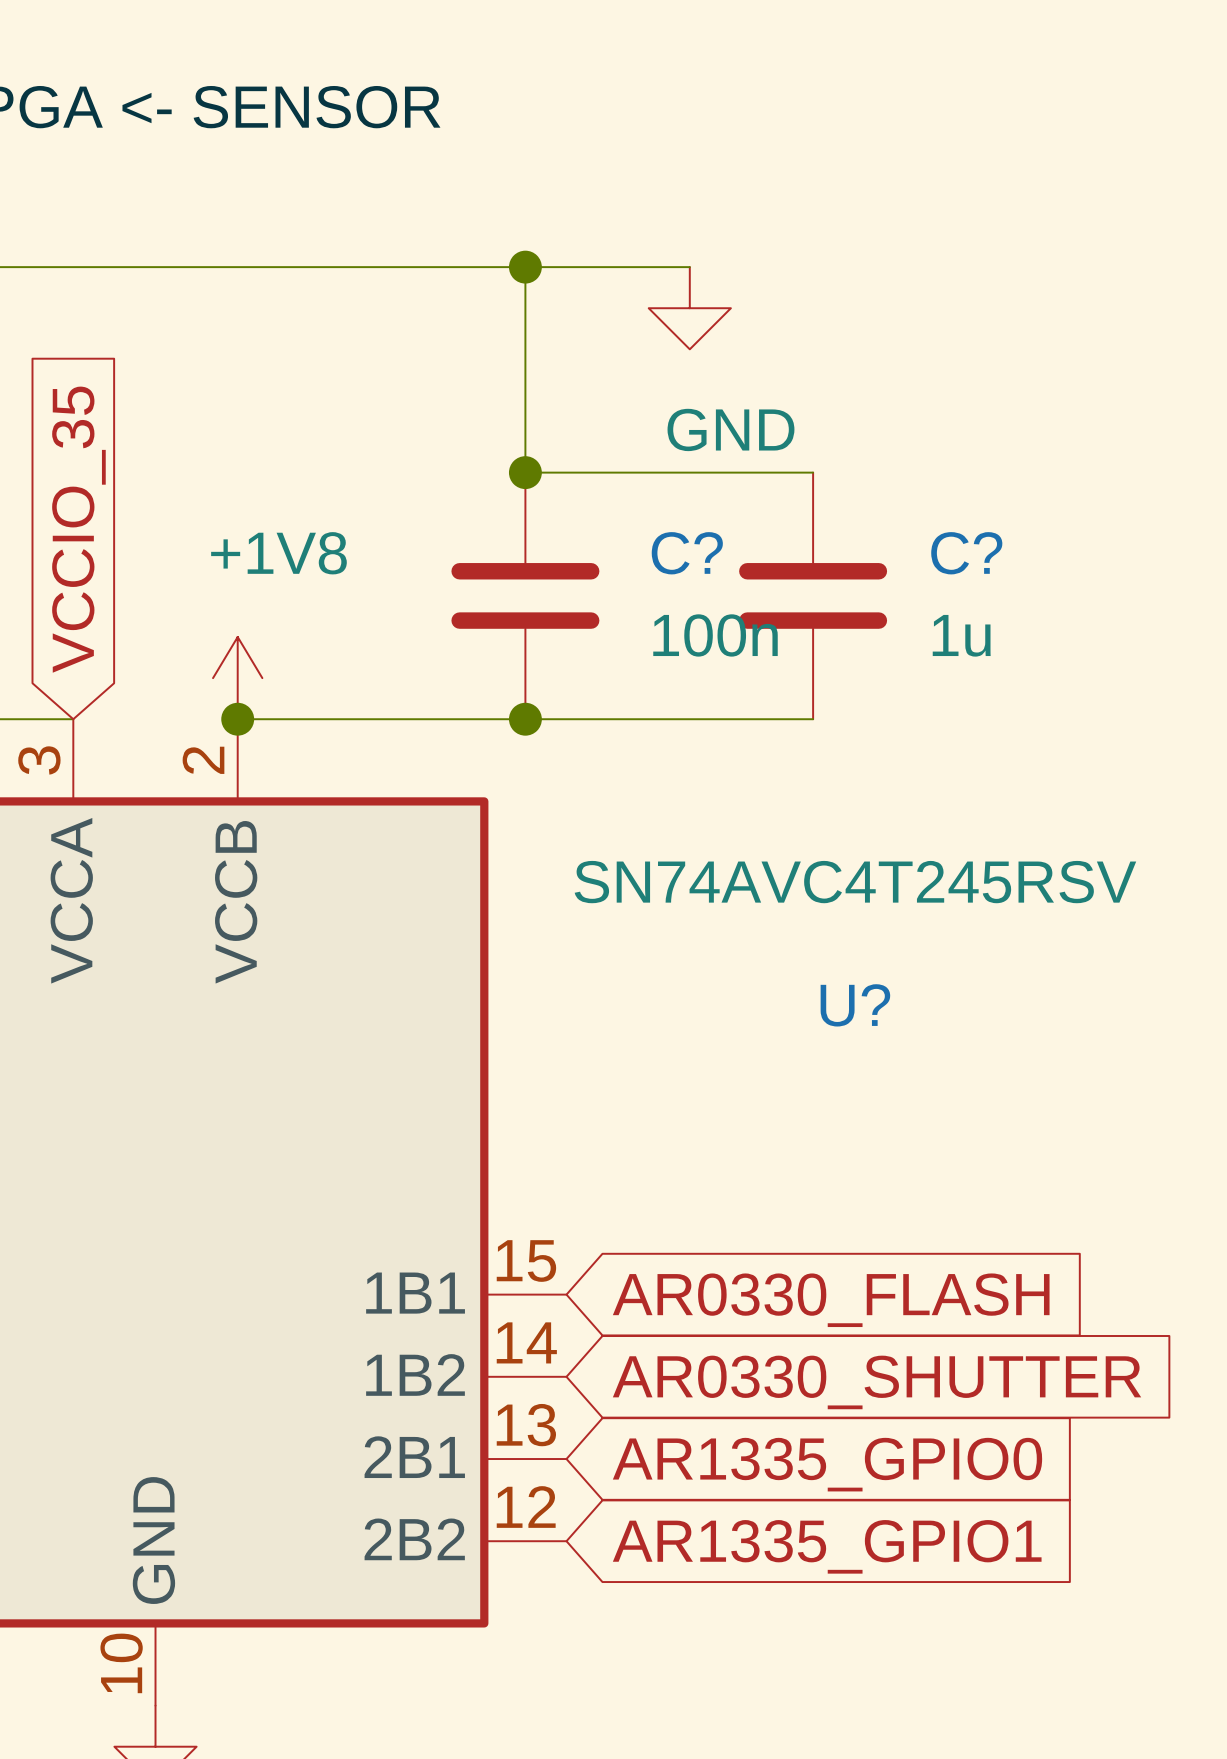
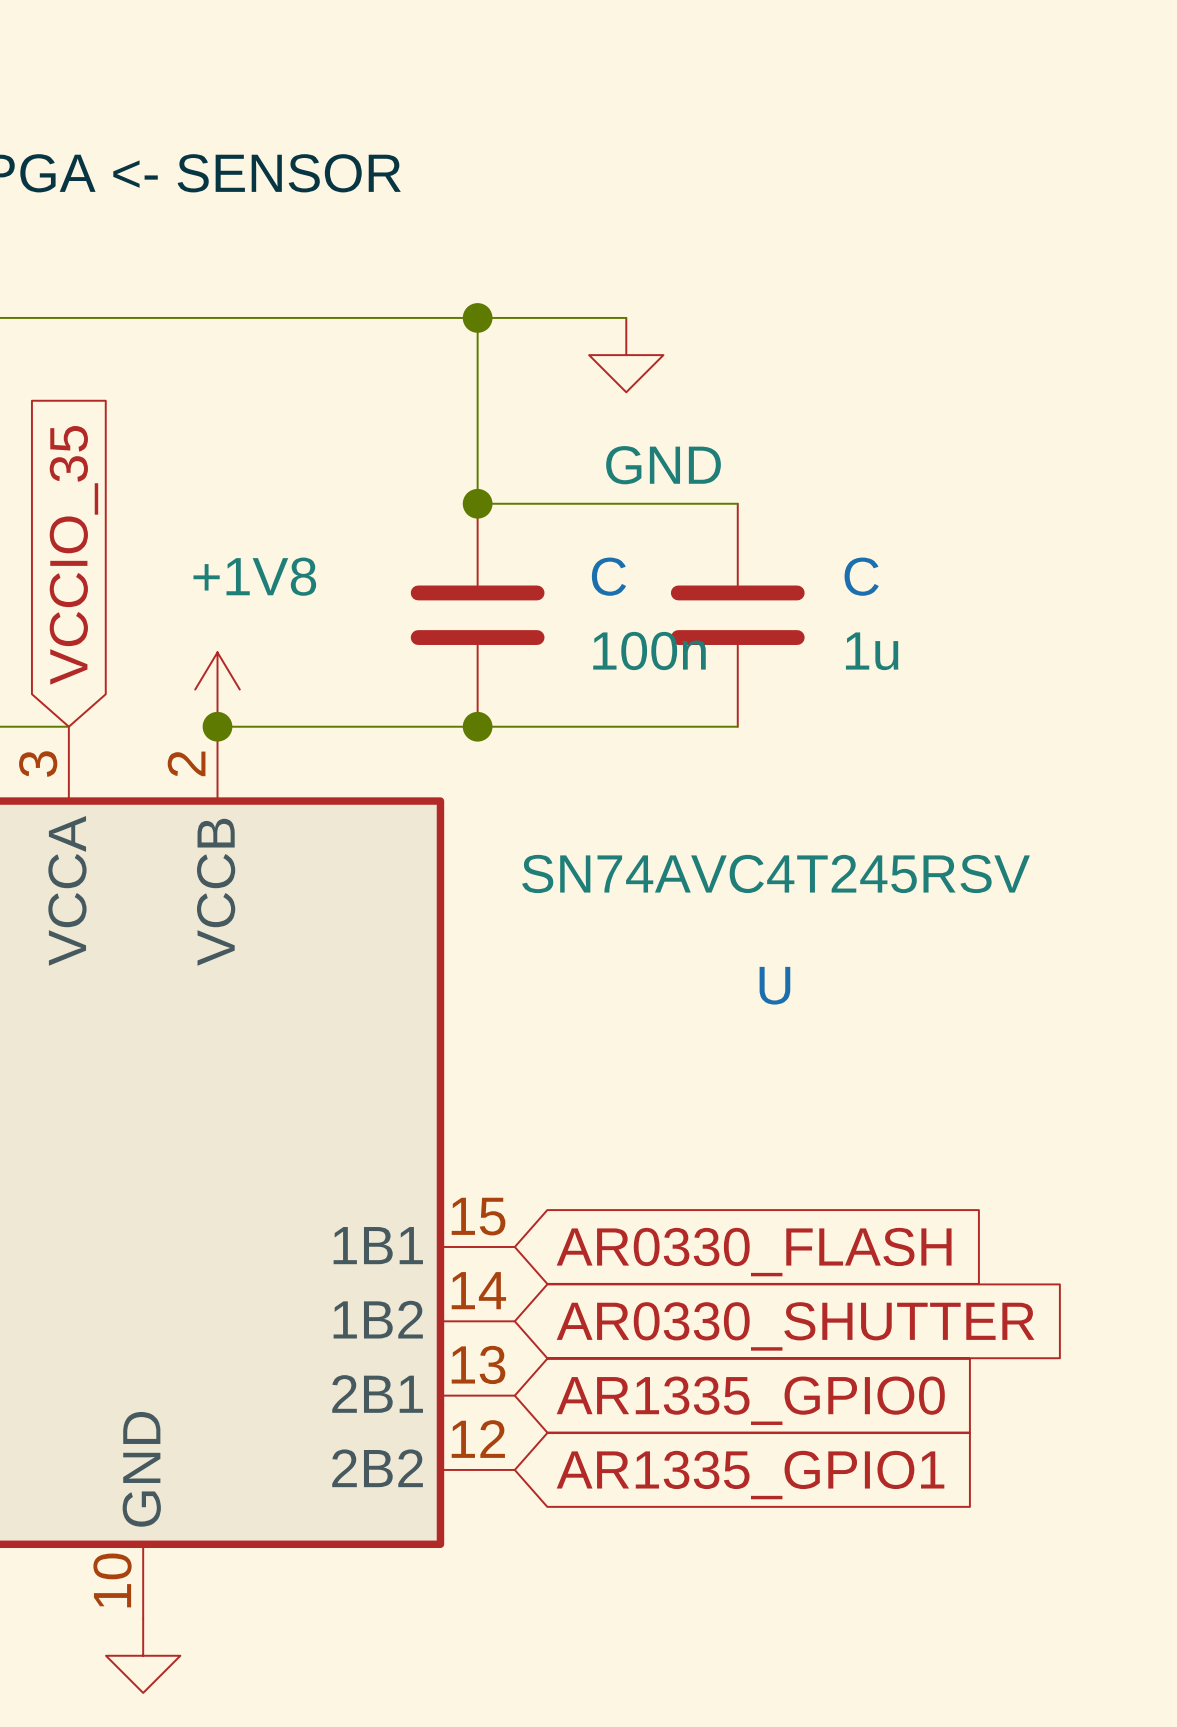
C? name: C? (687, 553) -> C (608, 576)
C? name: C? (966, 553) -> C (861, 576)
U? name: U? (855, 1005) -> U (774, 985)

